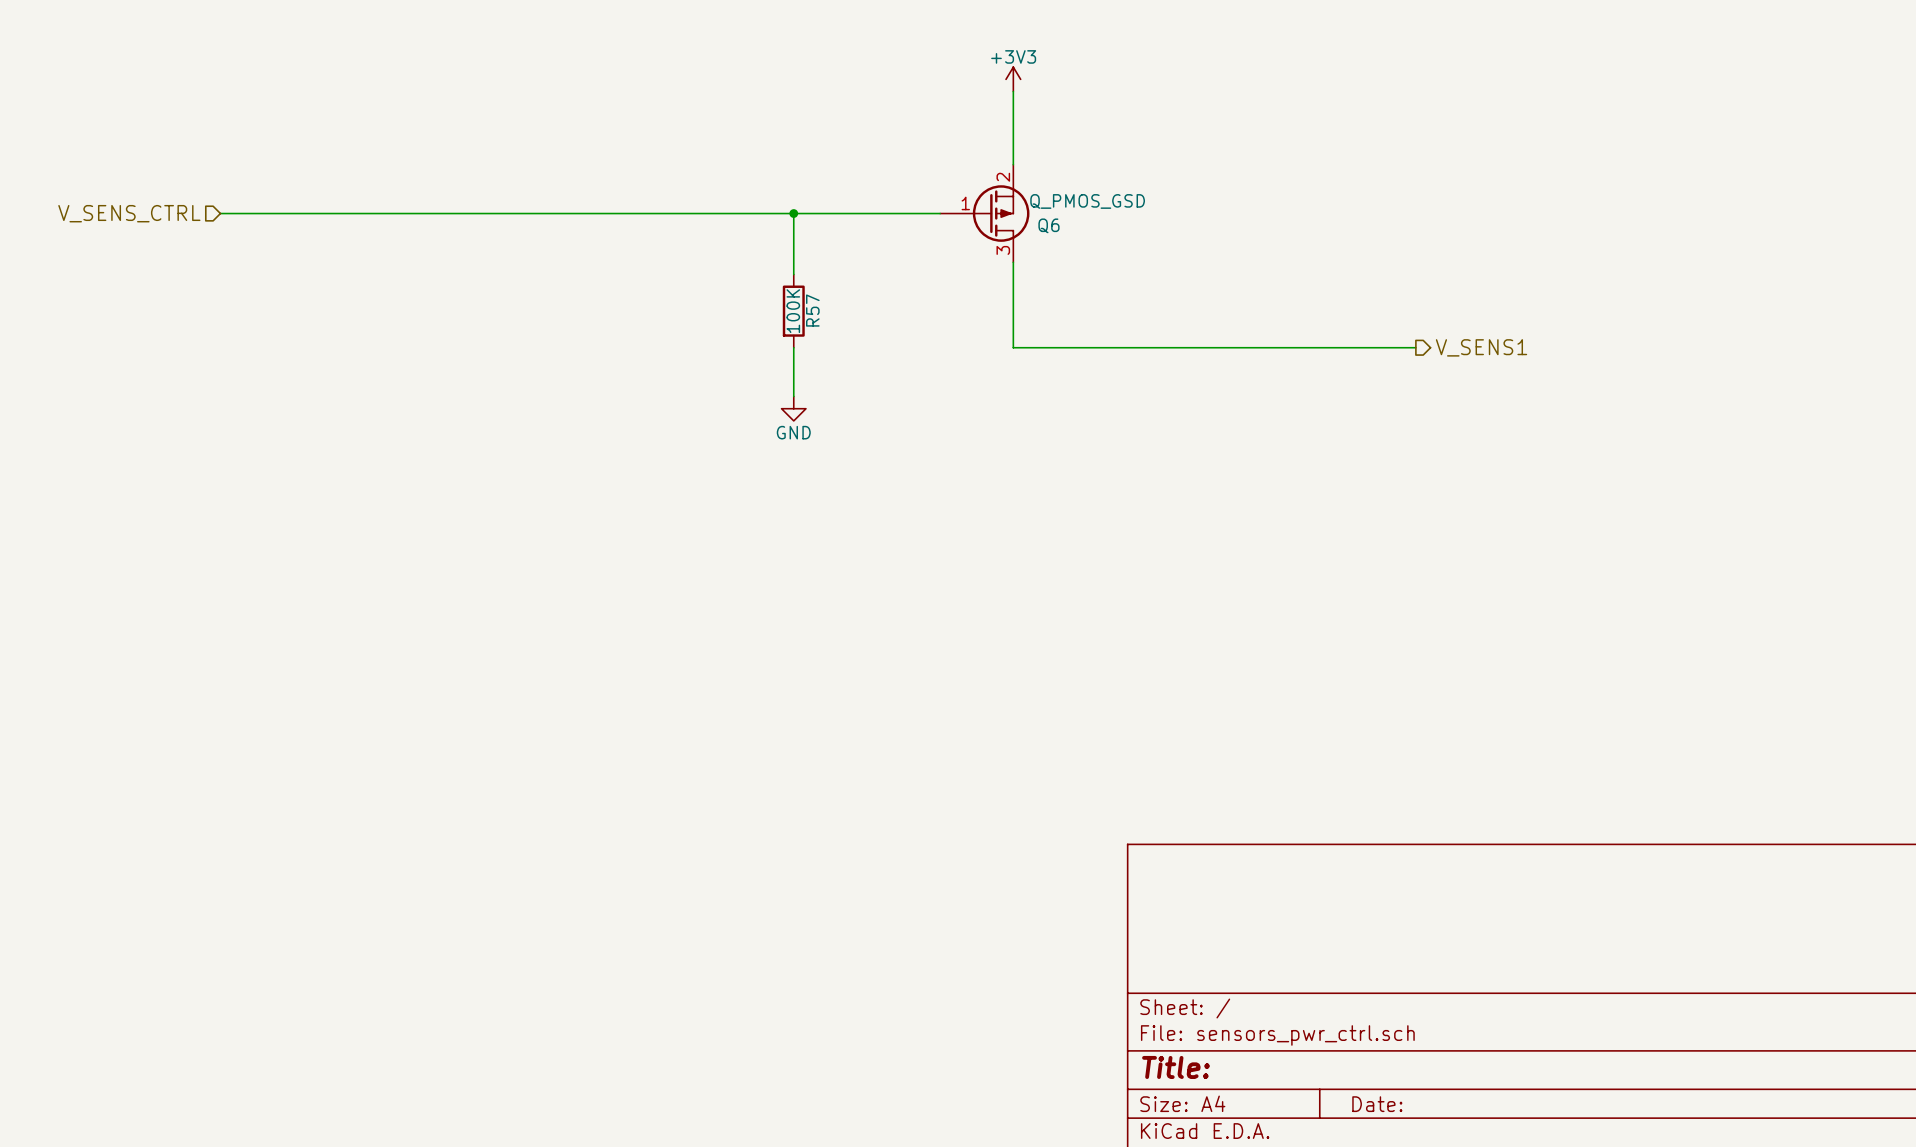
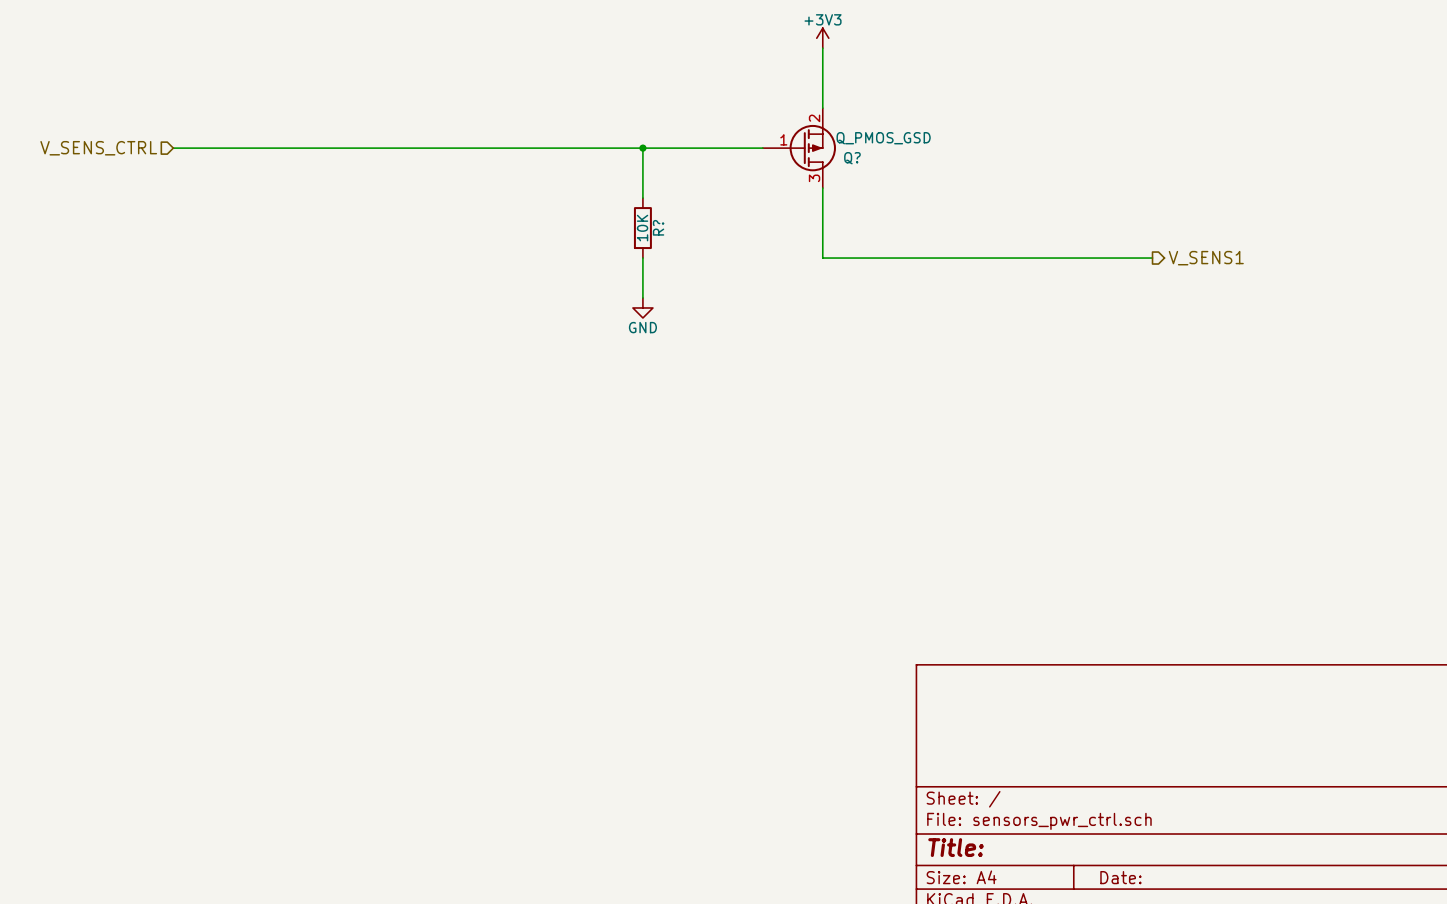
Q6 name: Q6 (1048, 225) -> Q? (852, 158)
R57 name: R57 (812, 310) -> R? (658, 227)
R57 value: 100K (793, 311) -> 10K (642, 228)

